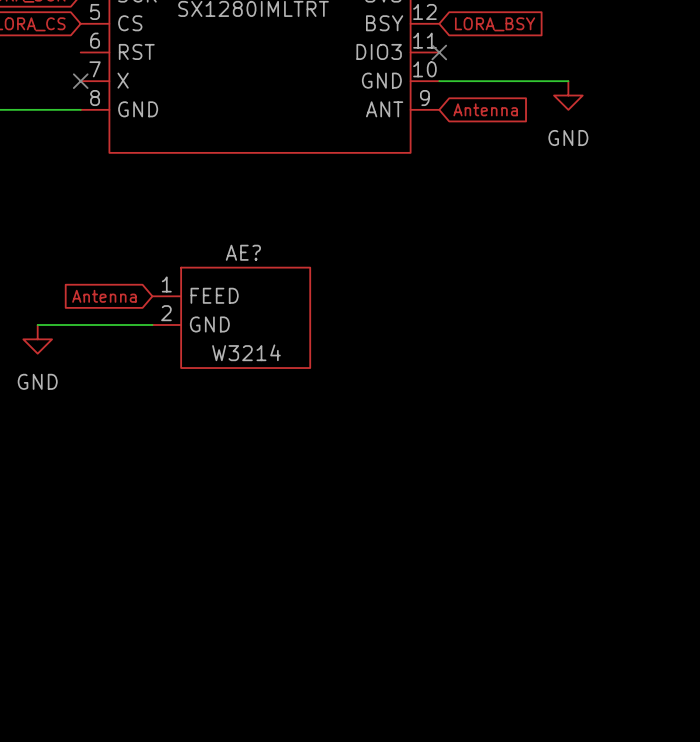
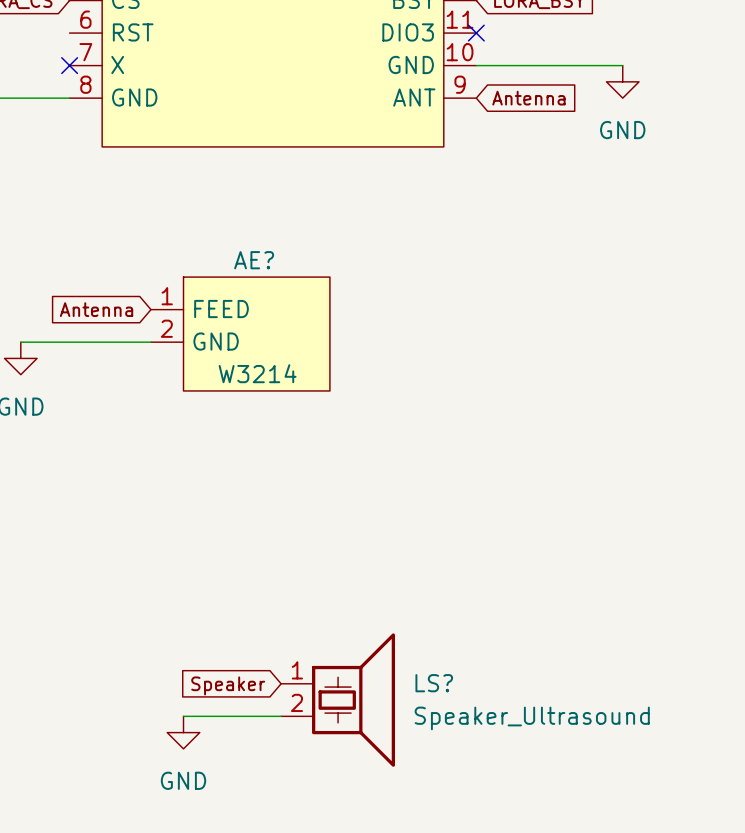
global label: none -> Speaker (228, 685)
LS?: none -> Speaker_Ultrasound (338, 700)
wire: none -> (183, 716) (281, 716)
power symbol: none -> GND (183, 732)

